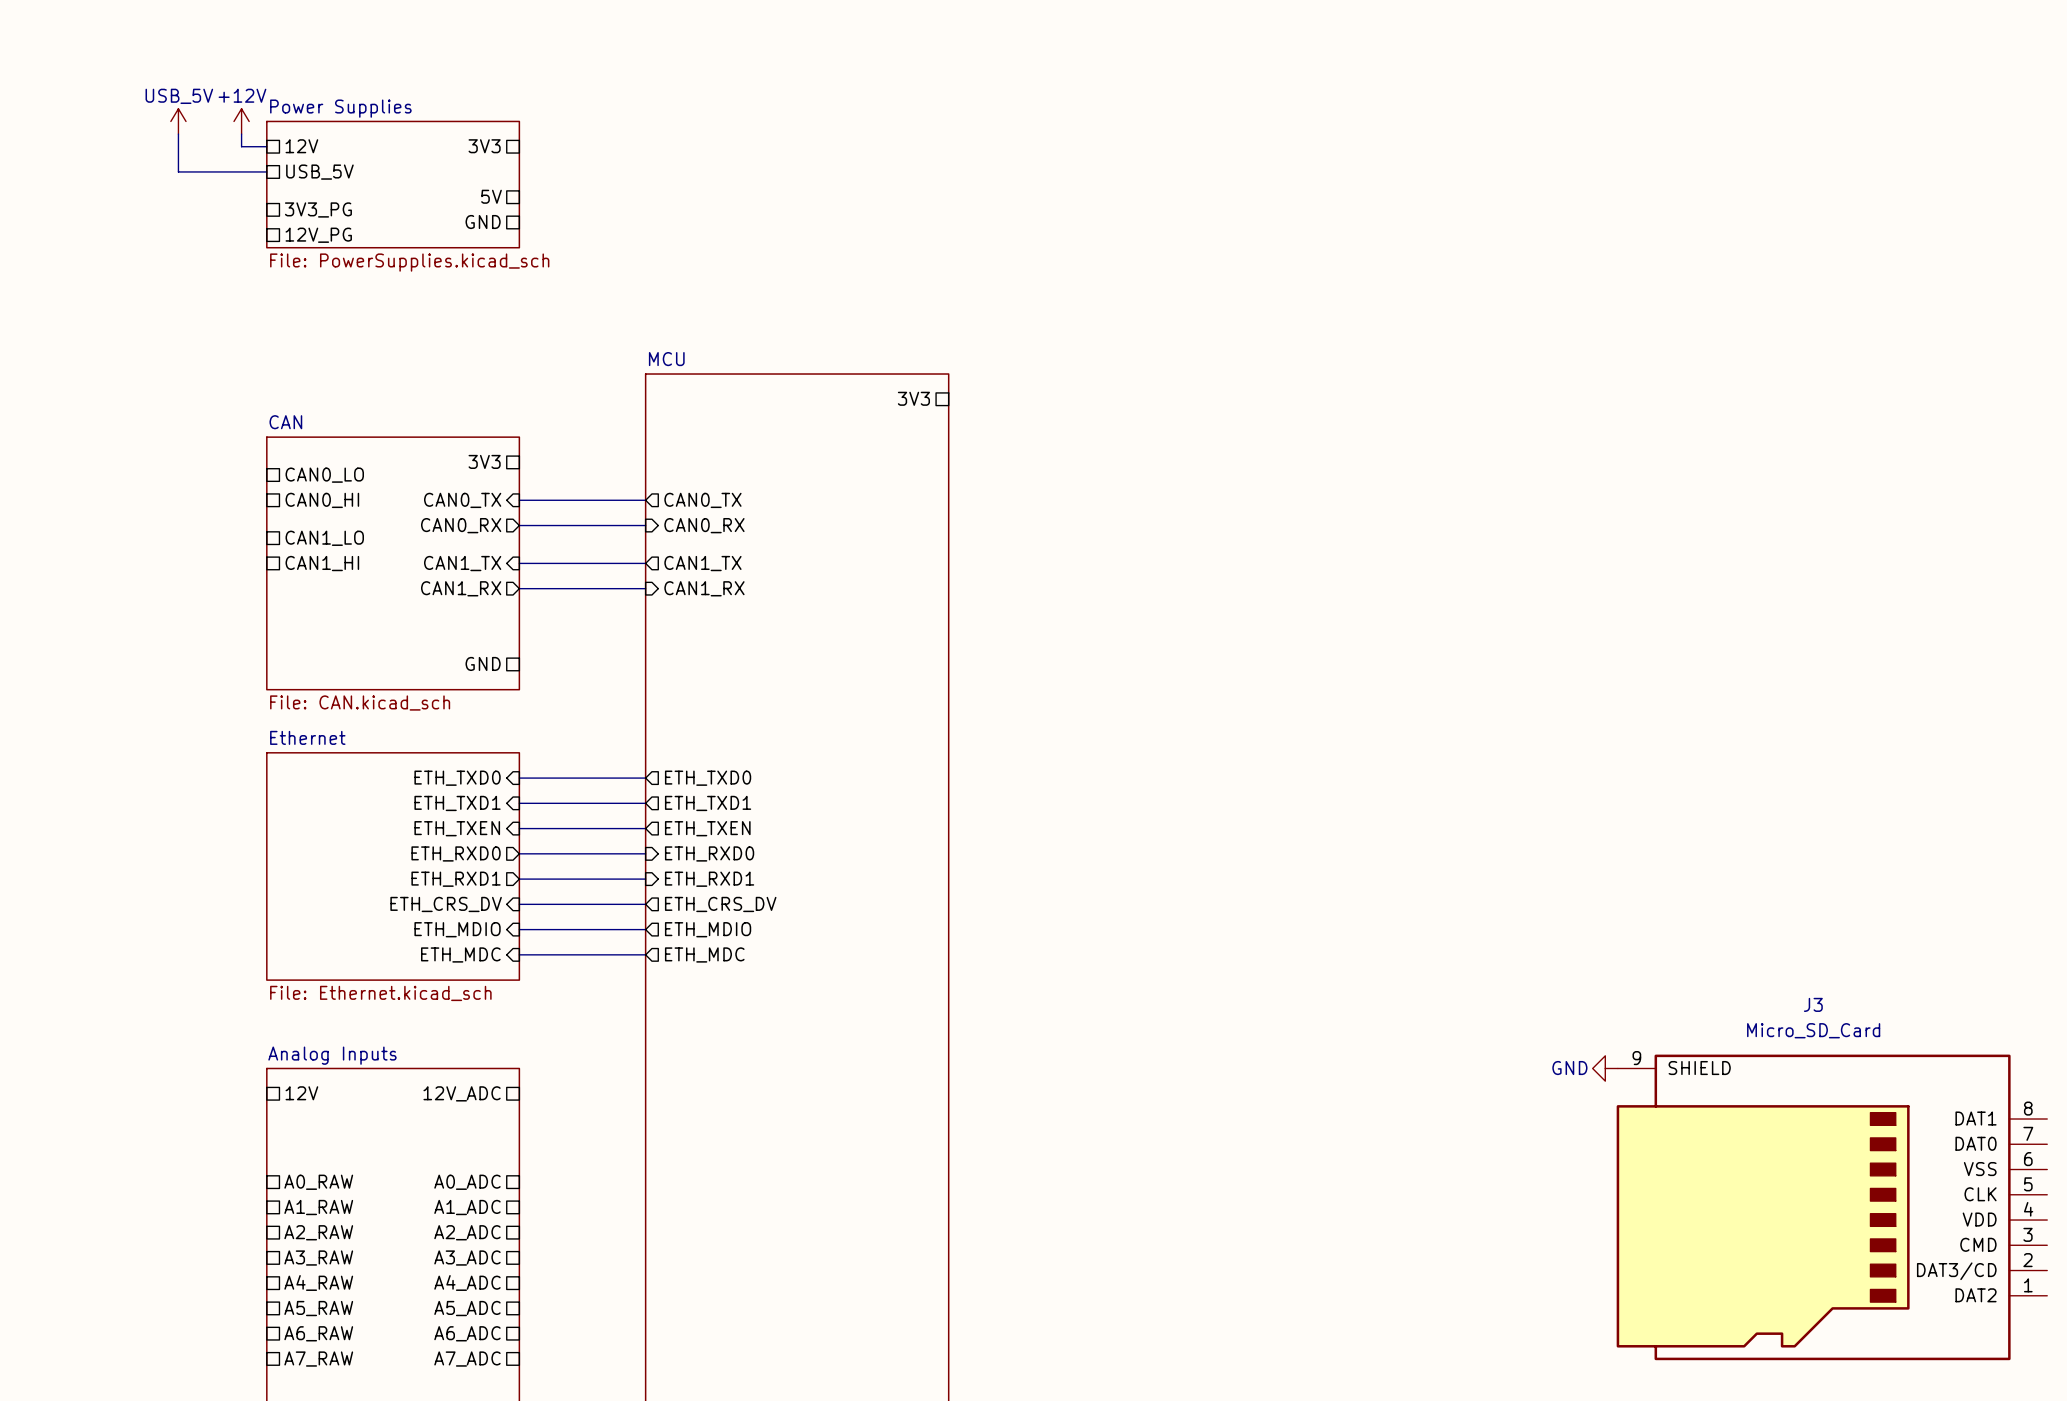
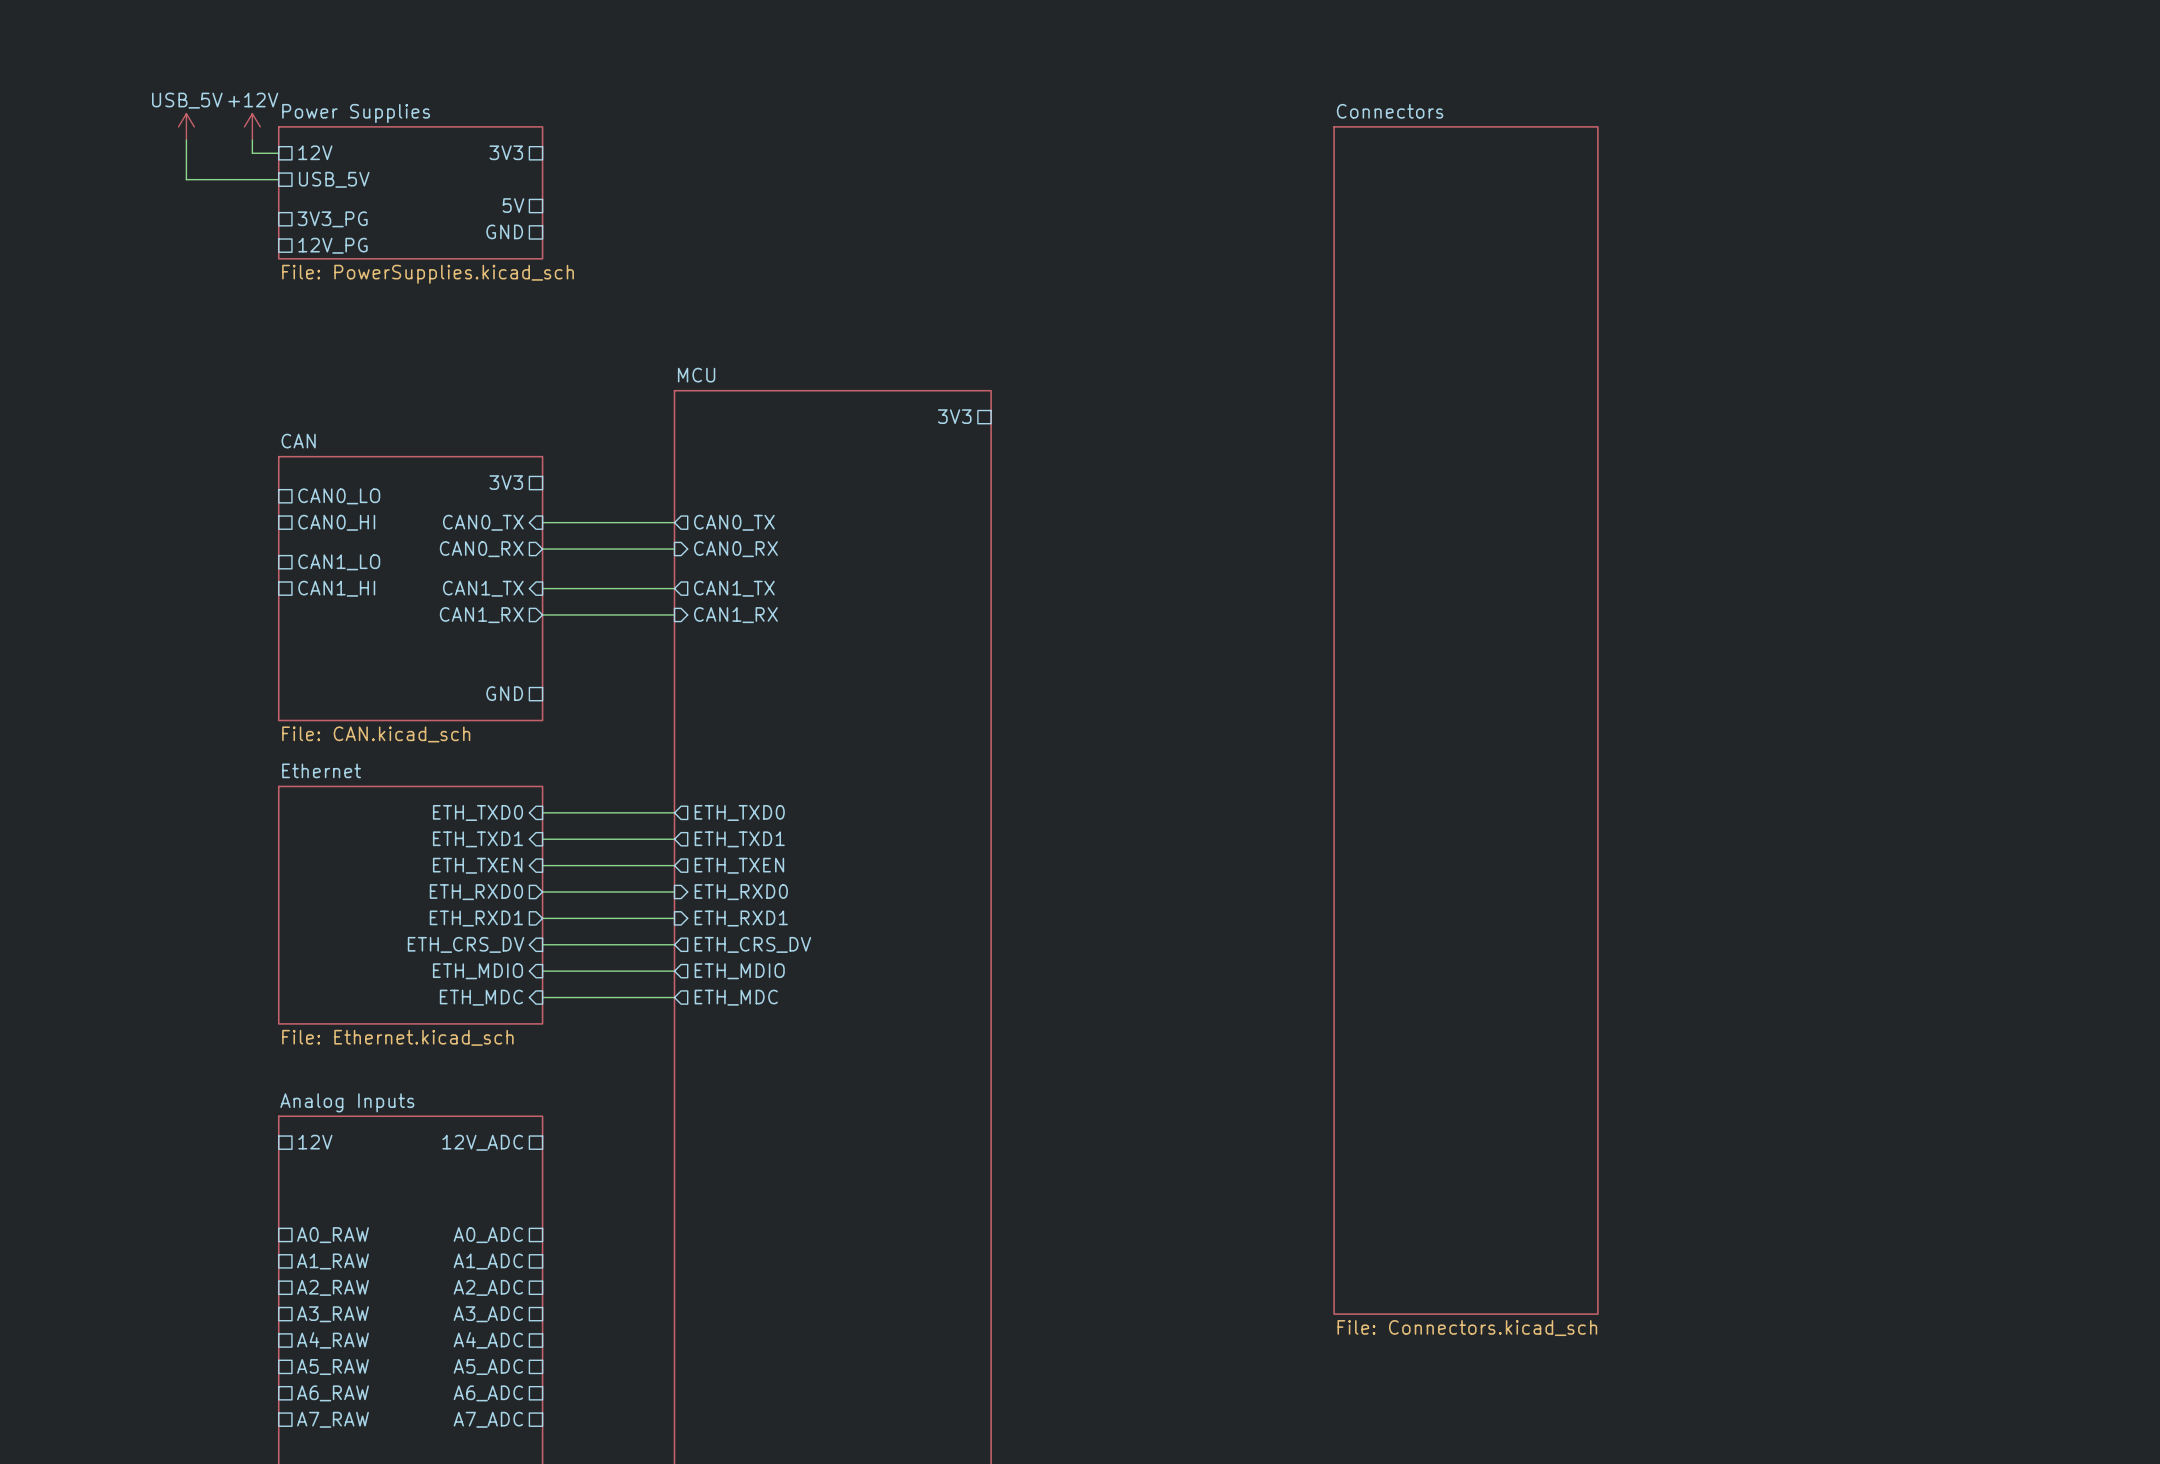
sheet Connectors: none -> File: Connectors.kicad_sch (1465, 720)
power symbol: GND (1605, 1068) -> none
J3: Micro_SD_Card (1831, 1207) -> none

